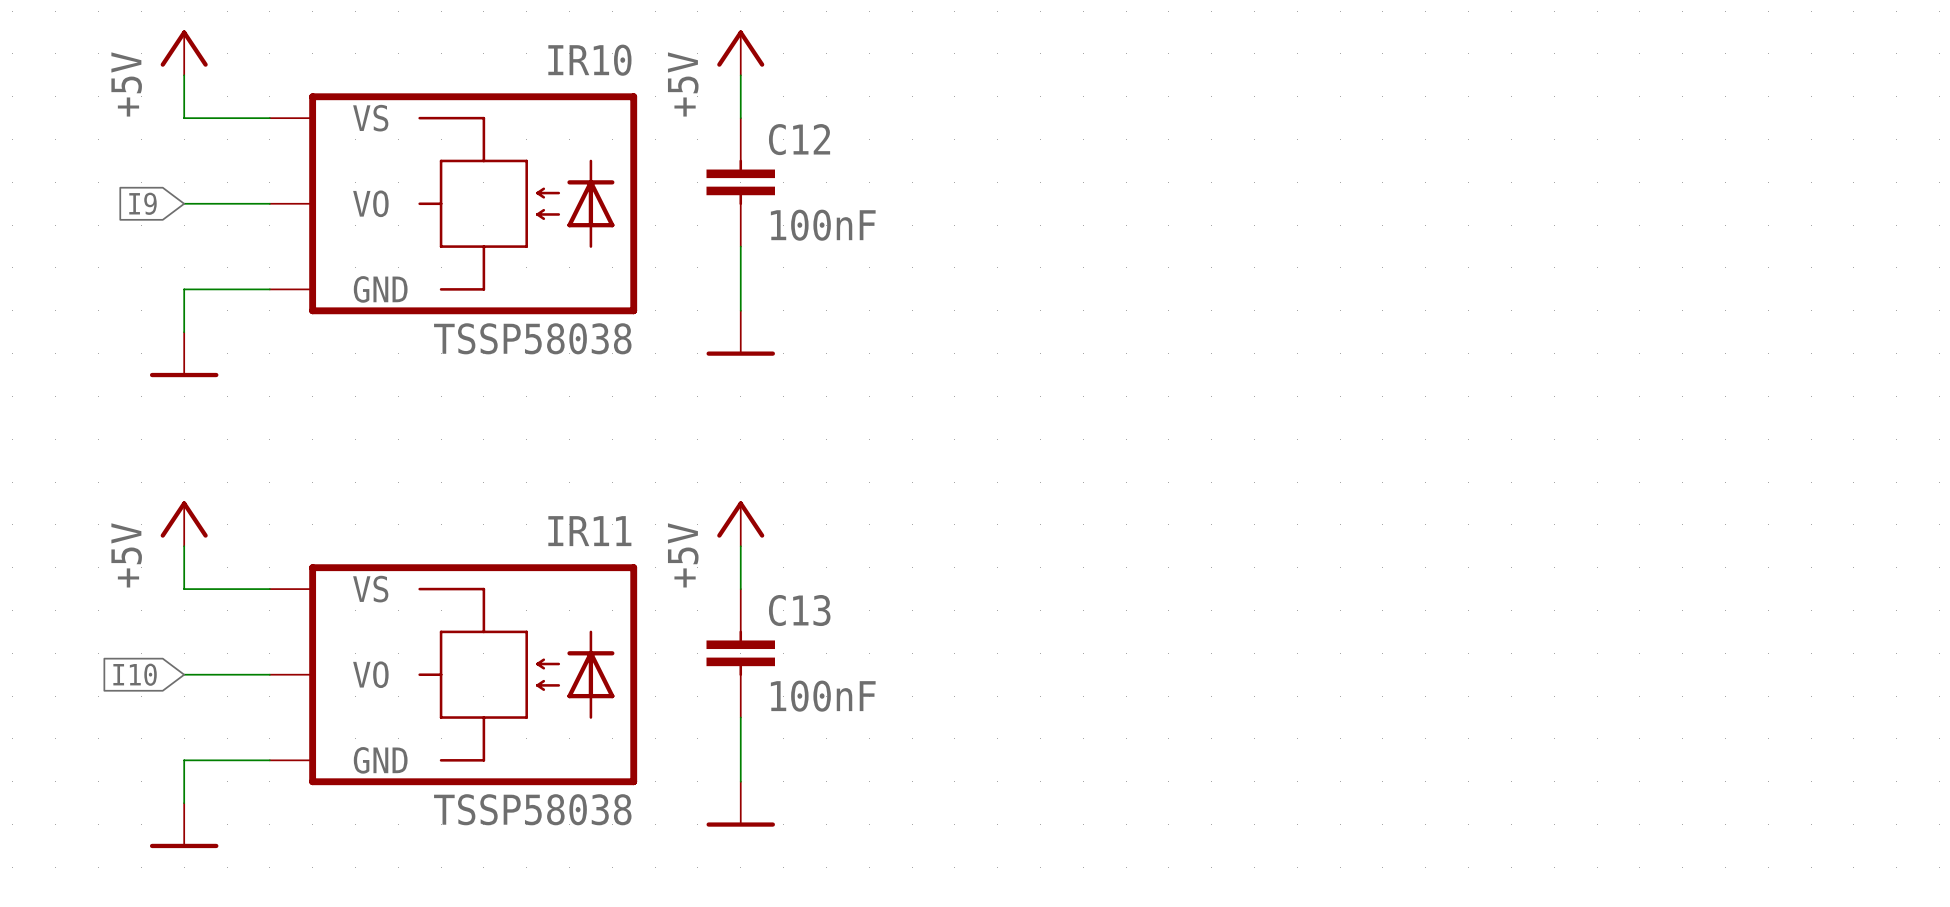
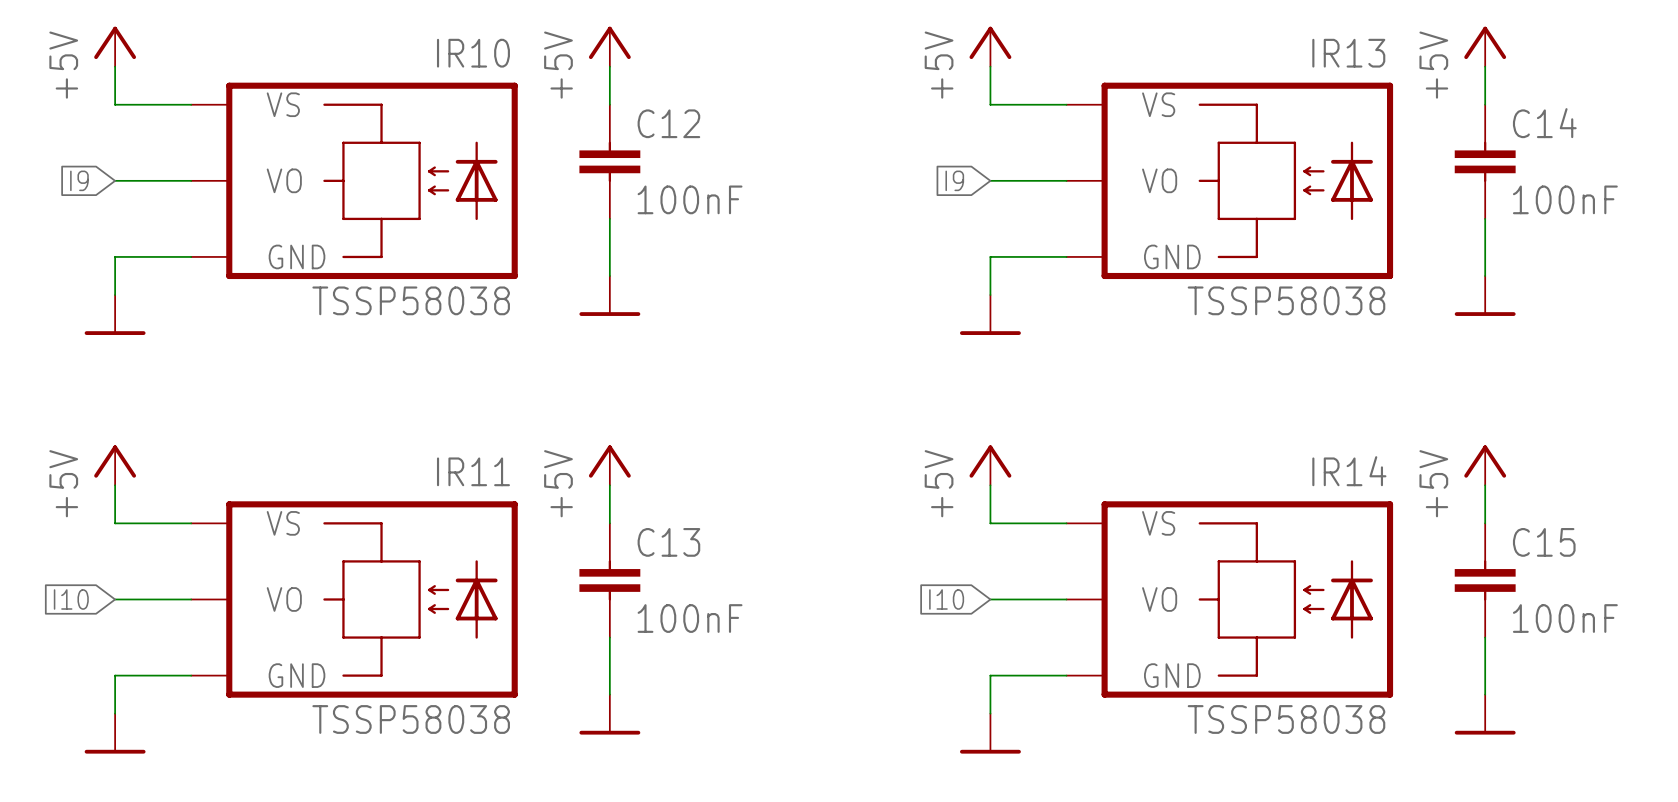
power symbol: none -> +5V (990, 46)
power symbol: none -> +5V (1485, 46)
wire: none -> (990, 66) (990, 104) (1066, 104)
wire: none -> (1485, 66) (1485, 104)
C14: none -> 100nF (1485, 161)
global label: none -> I9 (954, 180)
wire: none -> (990, 180) (1066, 180)
IR13: none -> TSSP58038 (1229, 180)
wire: none -> (1485, 218) (1485, 275)
wire: none -> (1066, 256) (990, 256) (990, 295)
power symbol: none -> (1485, 295)
power symbol: none -> (990, 315)
power symbol: none -> +5V (990, 465)
power symbol: none -> +5V (1485, 465)
wire: none -> (990, 485) (990, 523) (1066, 523)
wire: none -> (1485, 485) (1485, 523)
C15: none -> 100nF (1485, 580)
global label: none -> I10 (946, 599)
wire: none -> (990, 599) (1066, 599)
IR14: none -> TSSP58038 (1229, 599)
wire: none -> (1485, 637) (1485, 694)
wire: none -> (1066, 675) (990, 675) (990, 713)
power symbol: none -> (1485, 714)
power symbol: none -> (990, 733)

